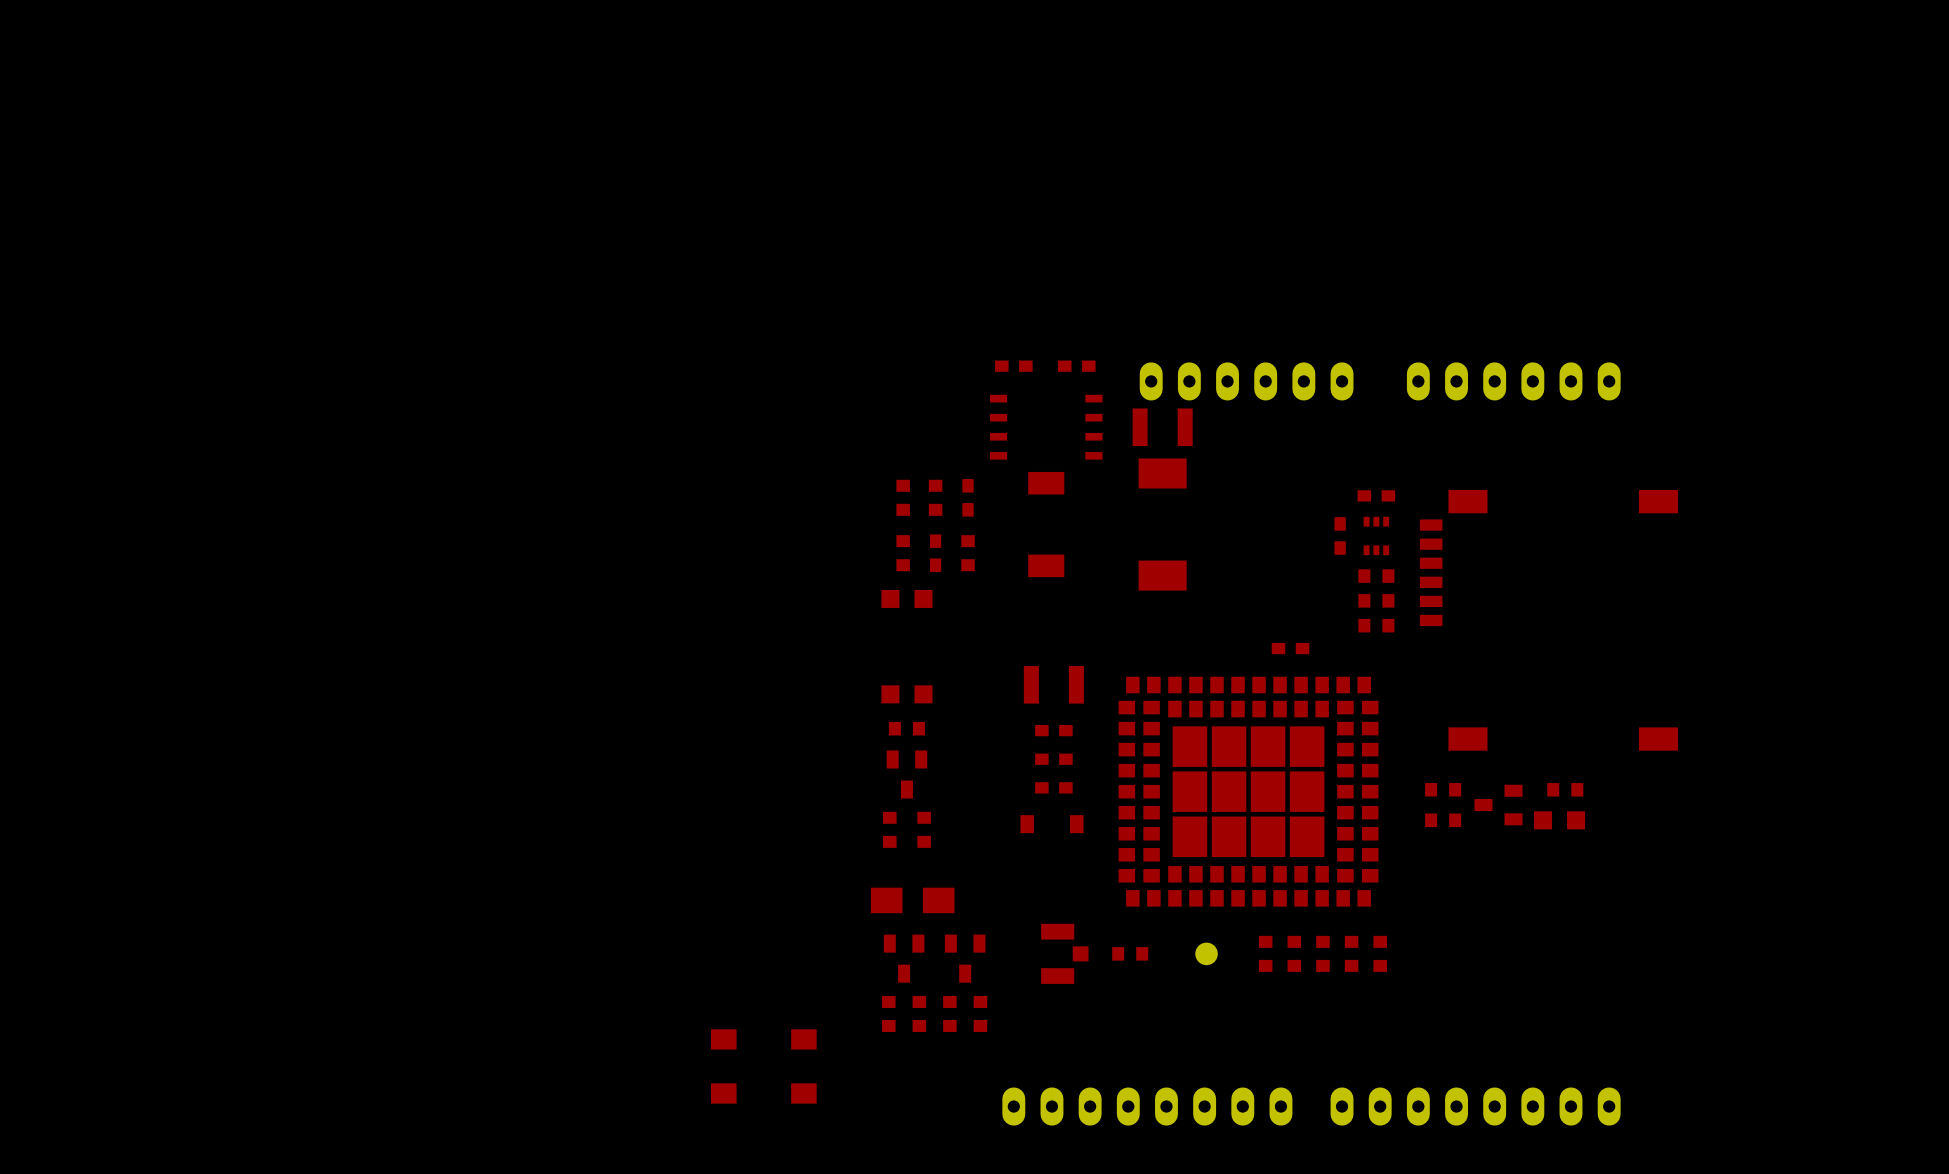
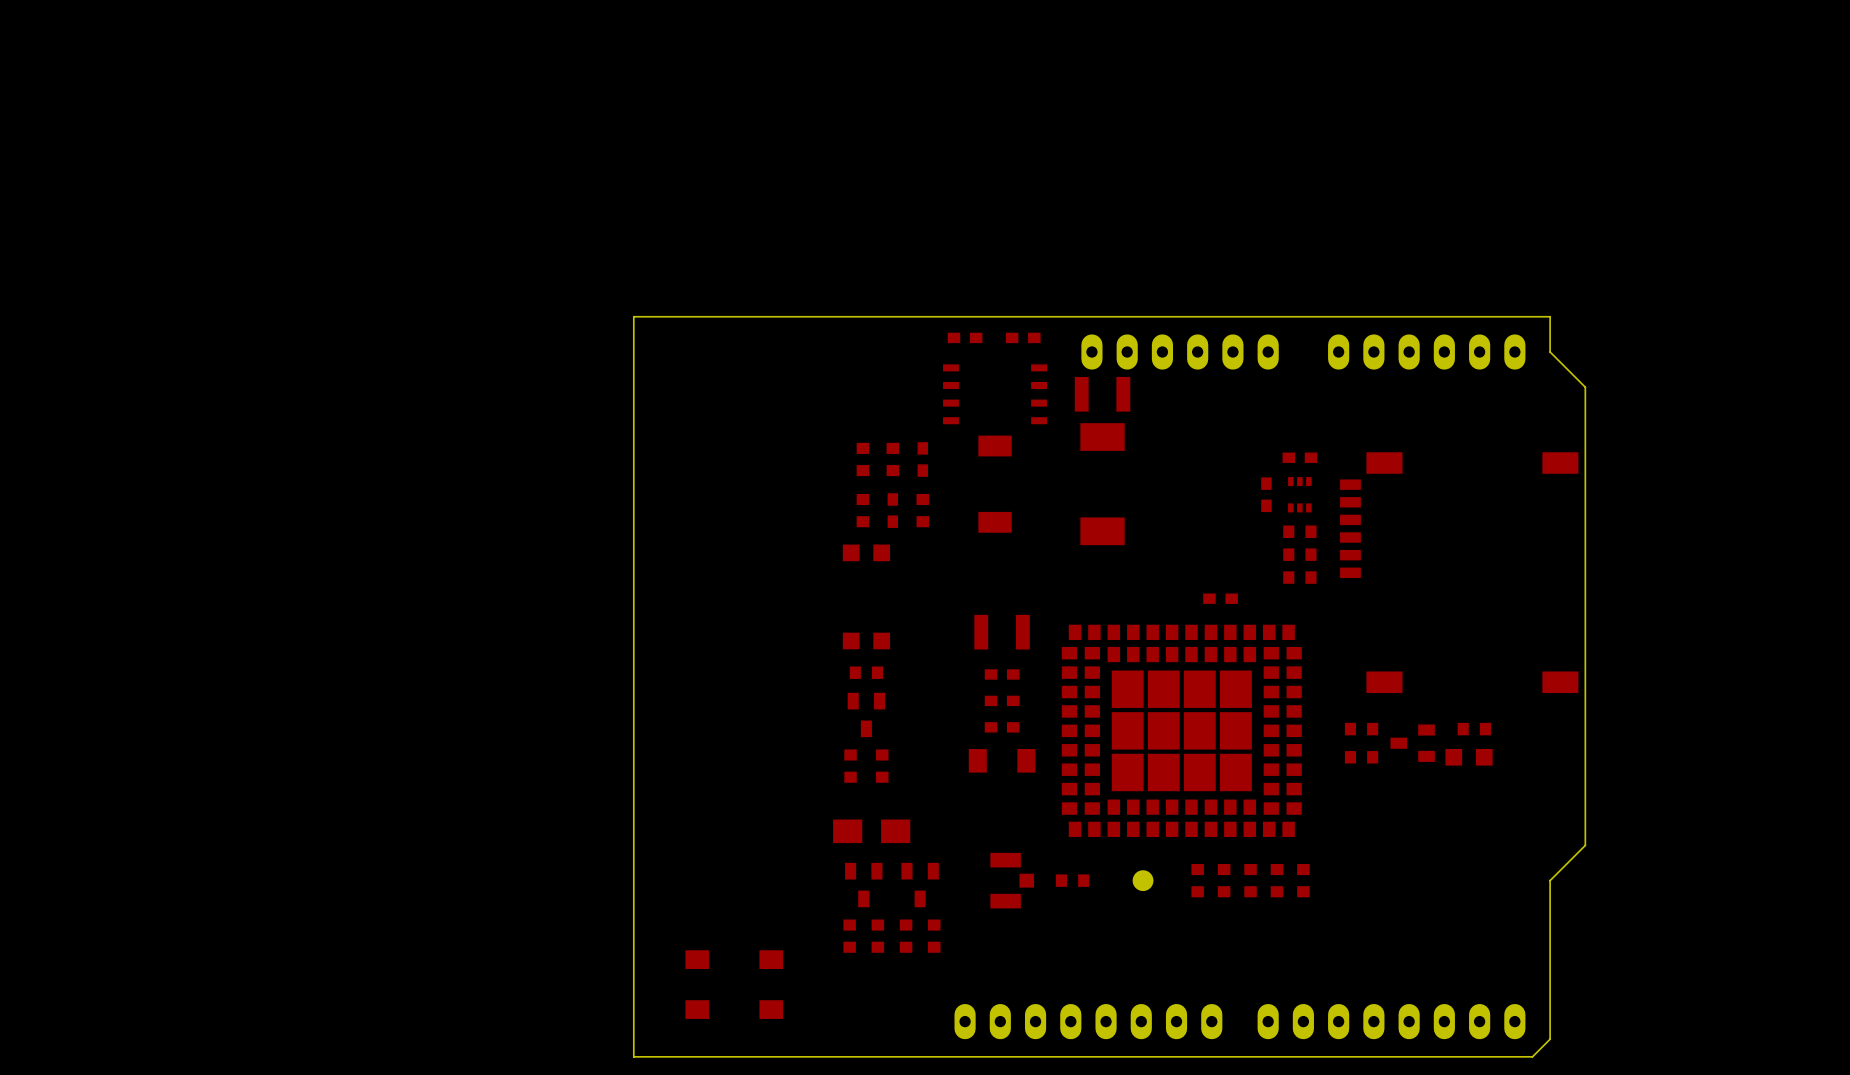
board edge: none -> (1550, 316) (633, 316) (633, 1056) (1532, 1056) (1550, 1039) (1550, 880) (1585, 845) (1585, 387) (1550, 352) (1550, 316)
part footprint: [1020, 815, 1084, 834] -> [968, 749, 1036, 773]

